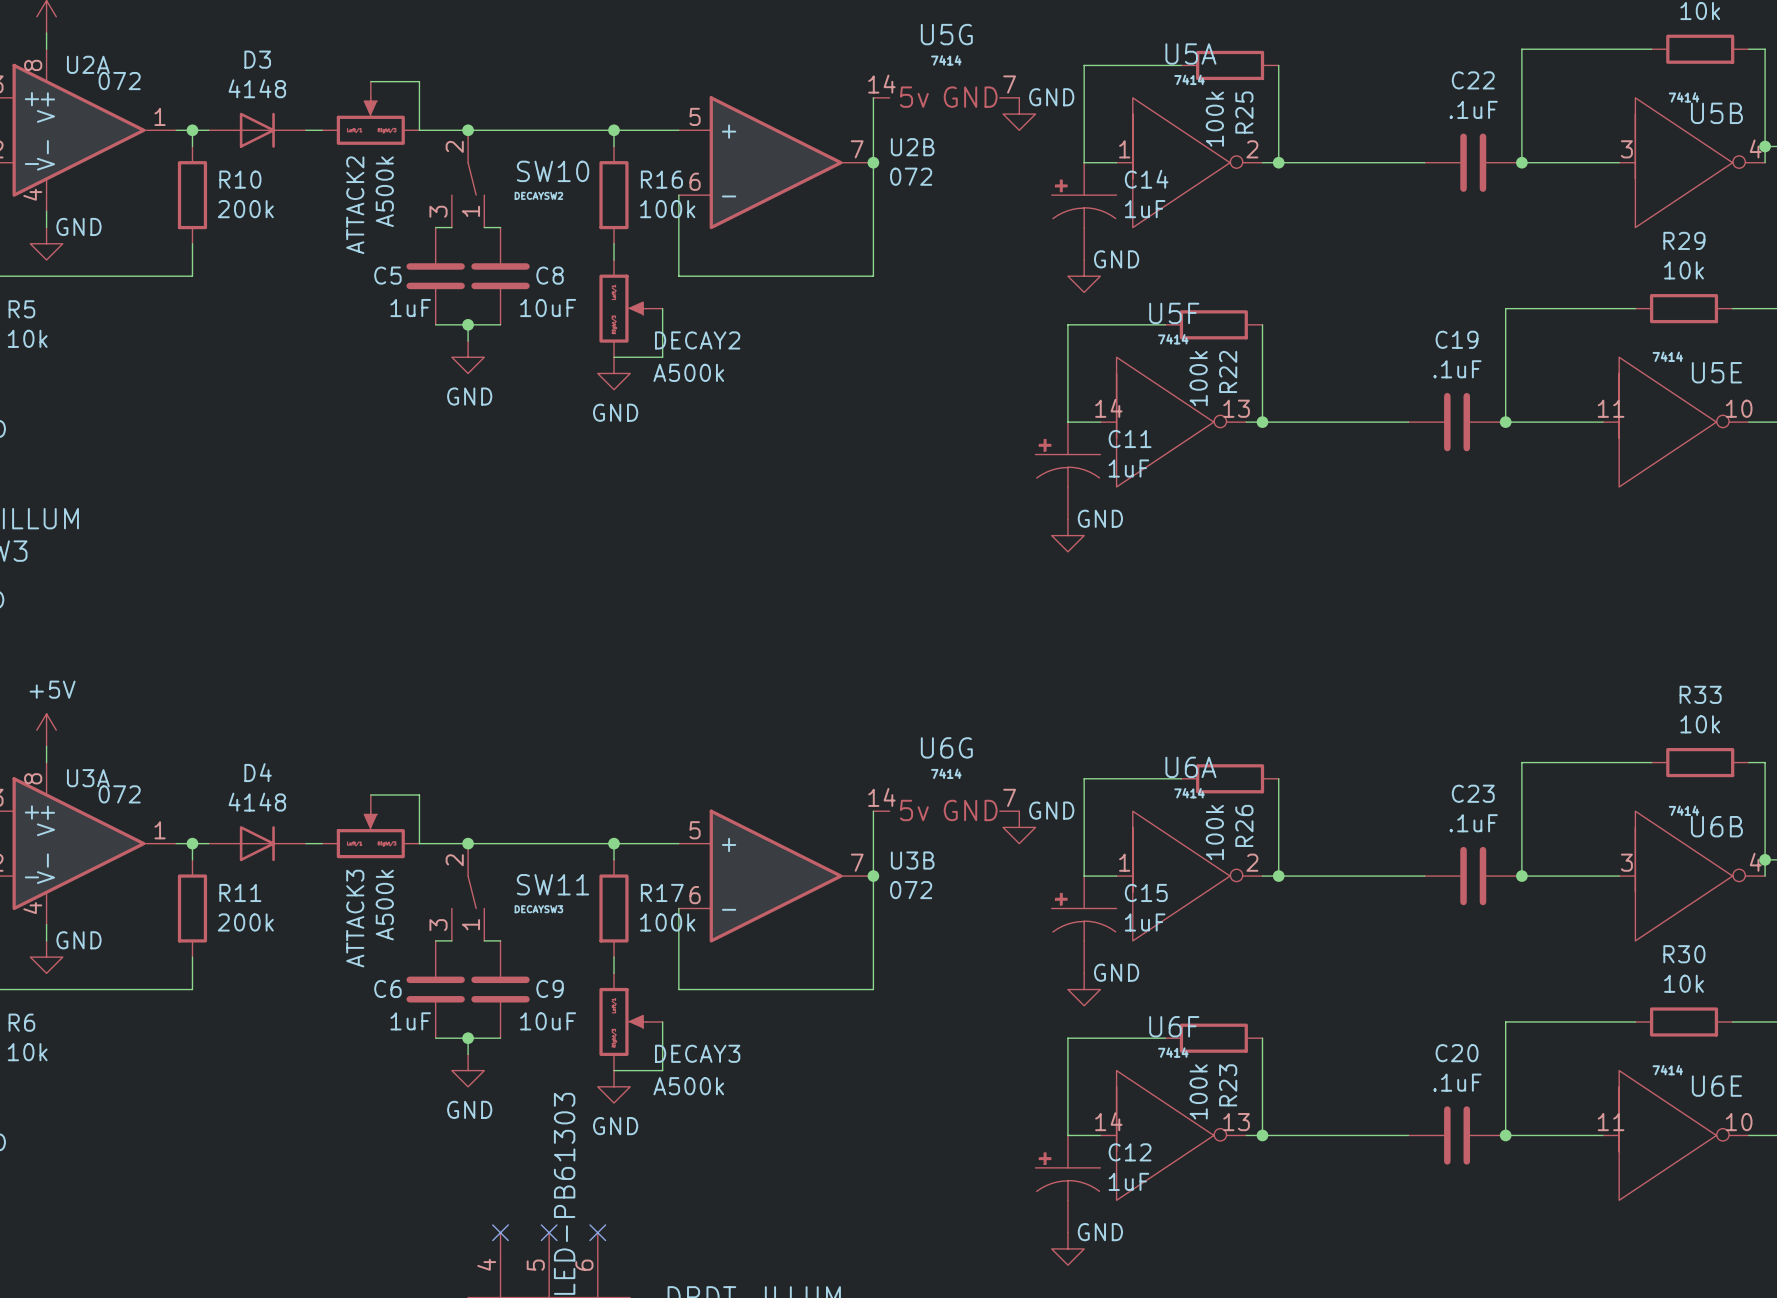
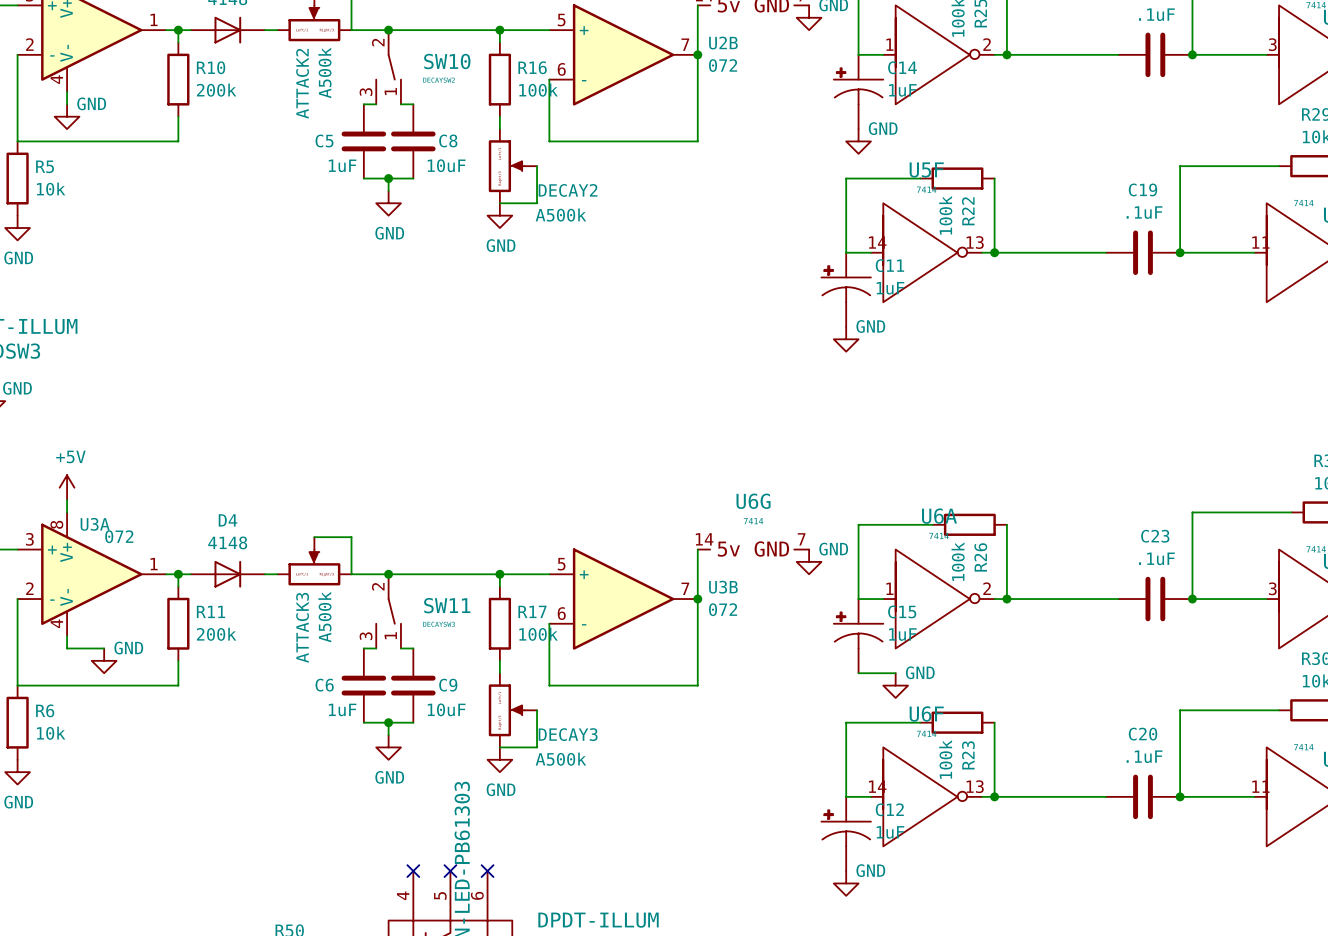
wire: none -> (67, 648) (104, 648)
power symbol position: GND (46, 957) -> GND (104, 660)
wire: none -> (858, 673) (895, 673)
power symbol position: GND (1084, 989) -> GND (895, 685)

